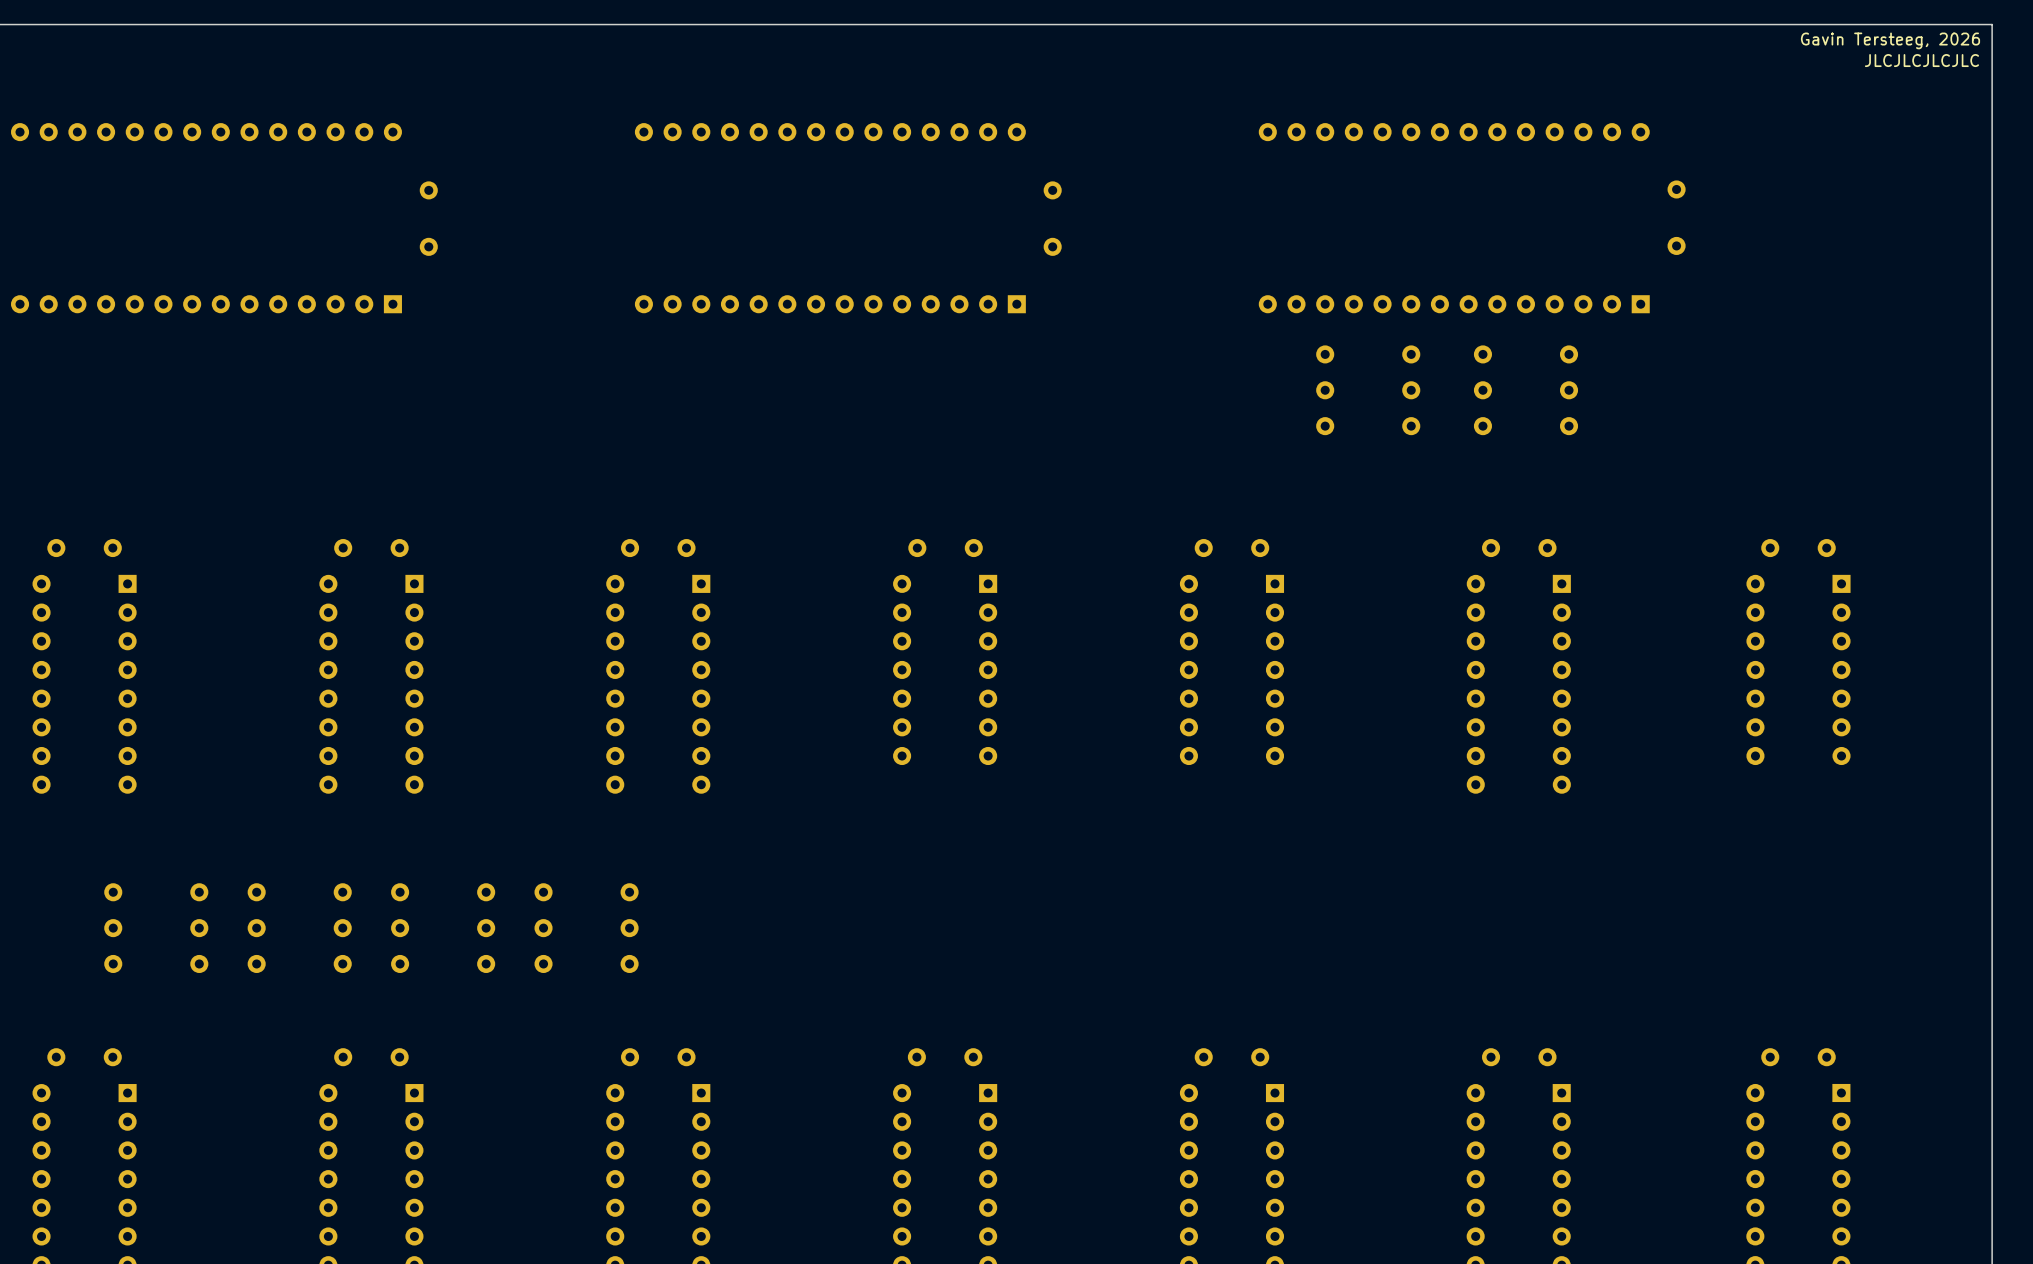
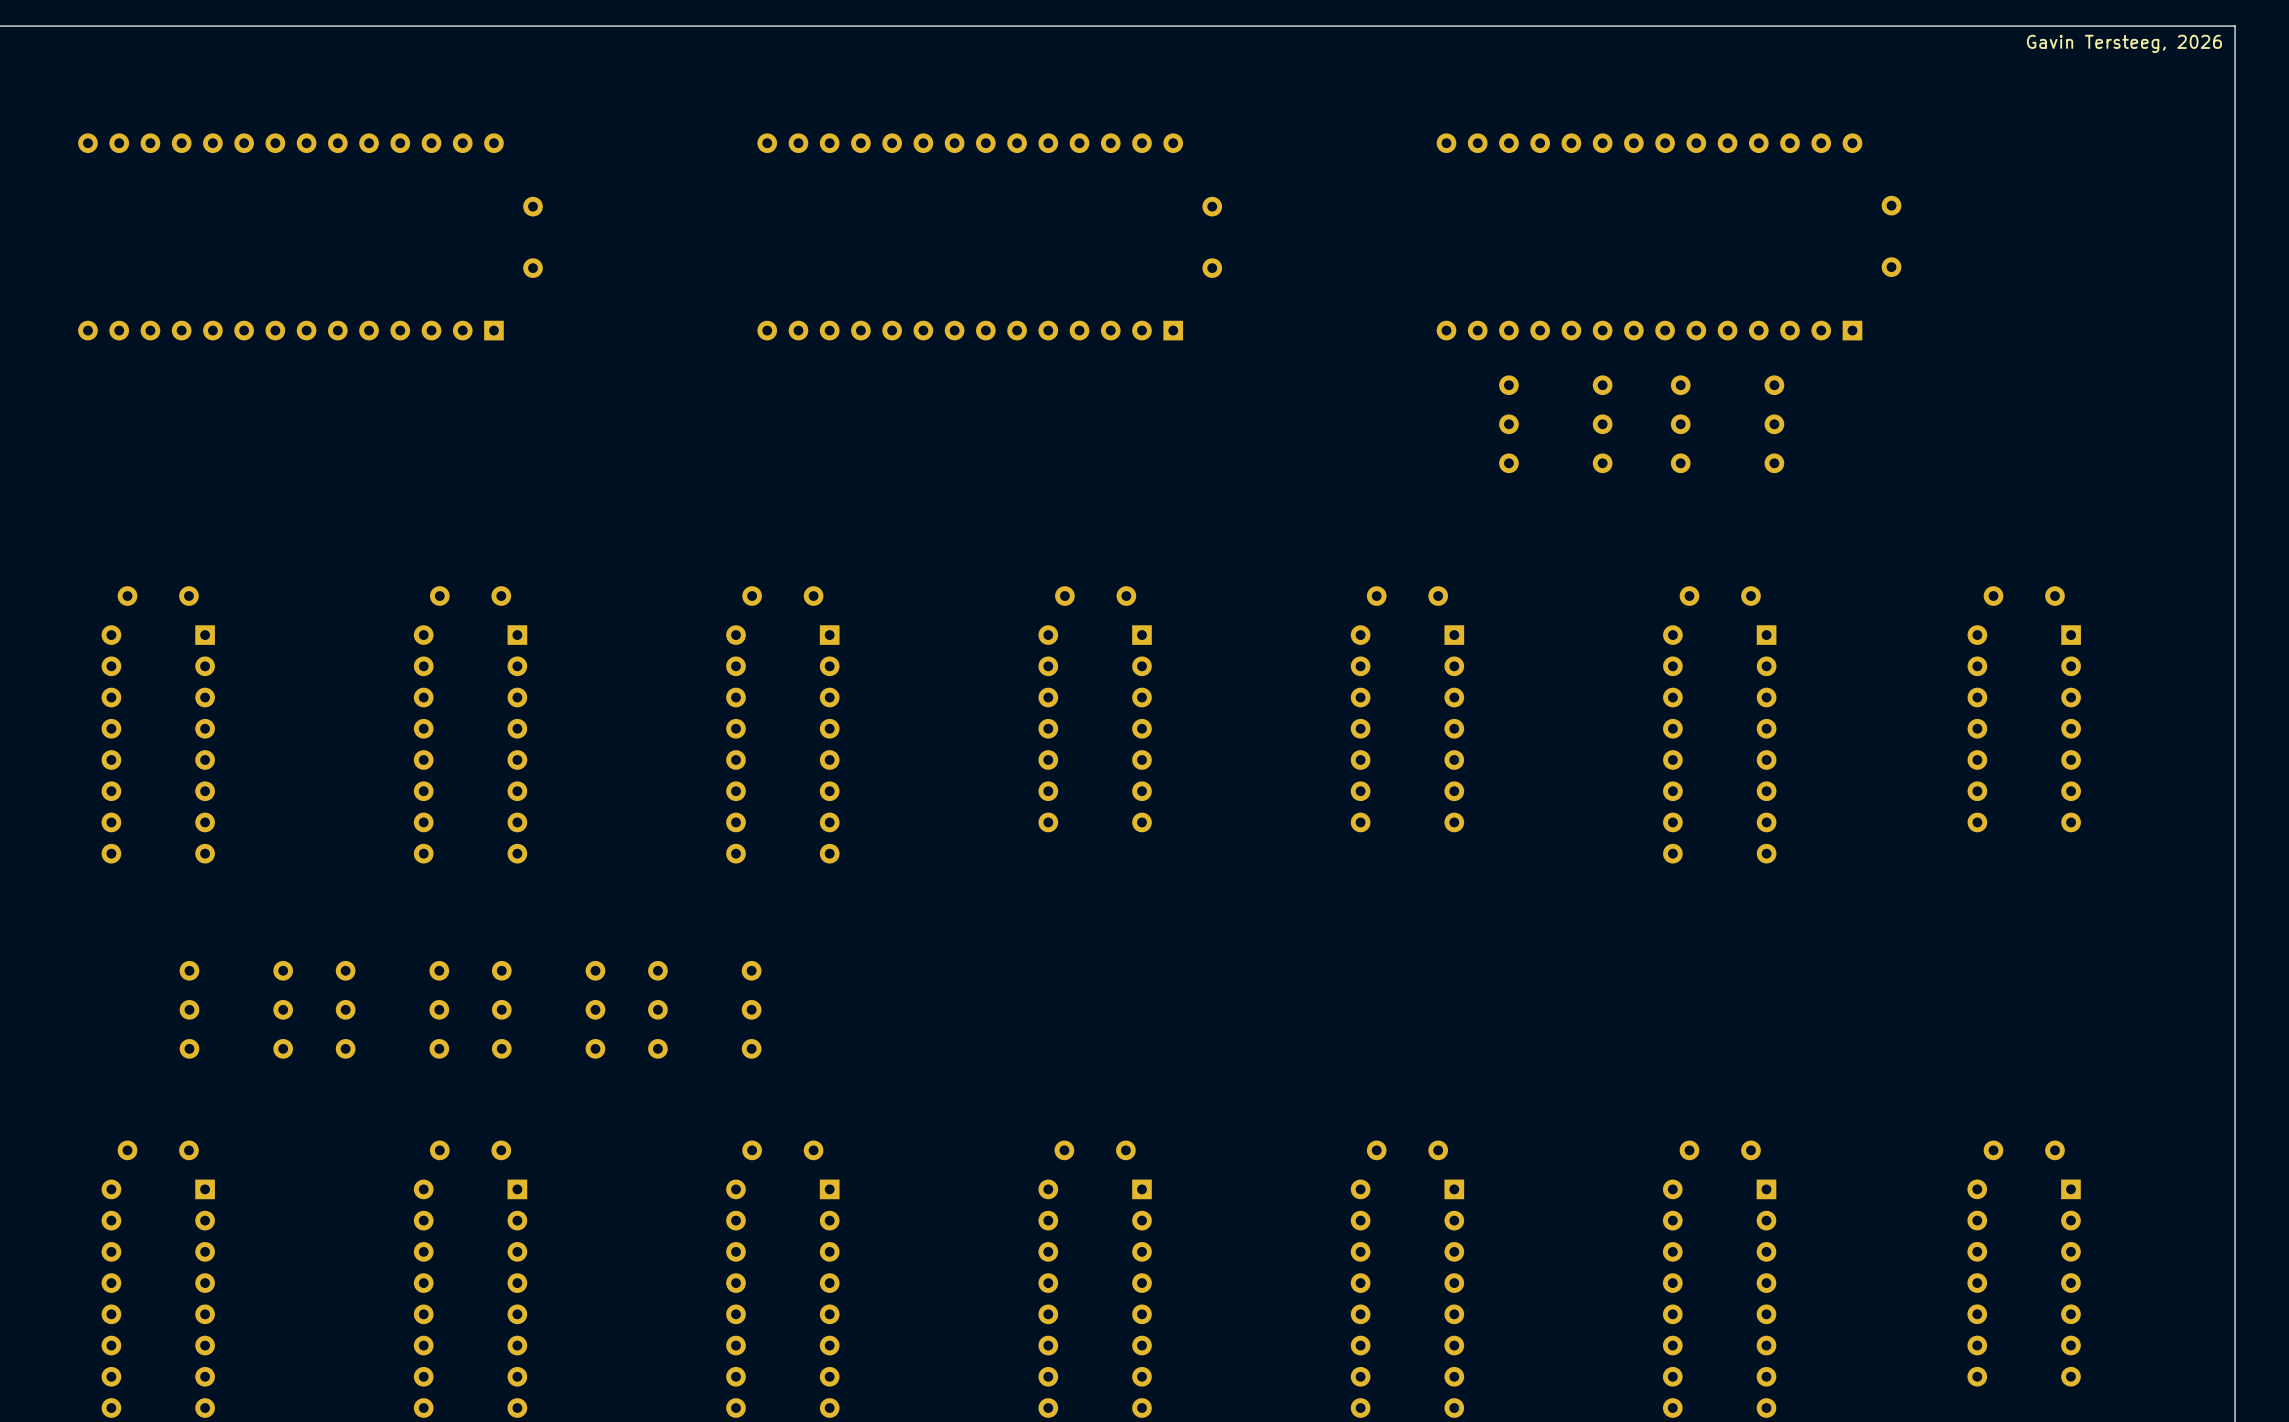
text: JLCJLCJLCJLC (1921, 60) -> none

